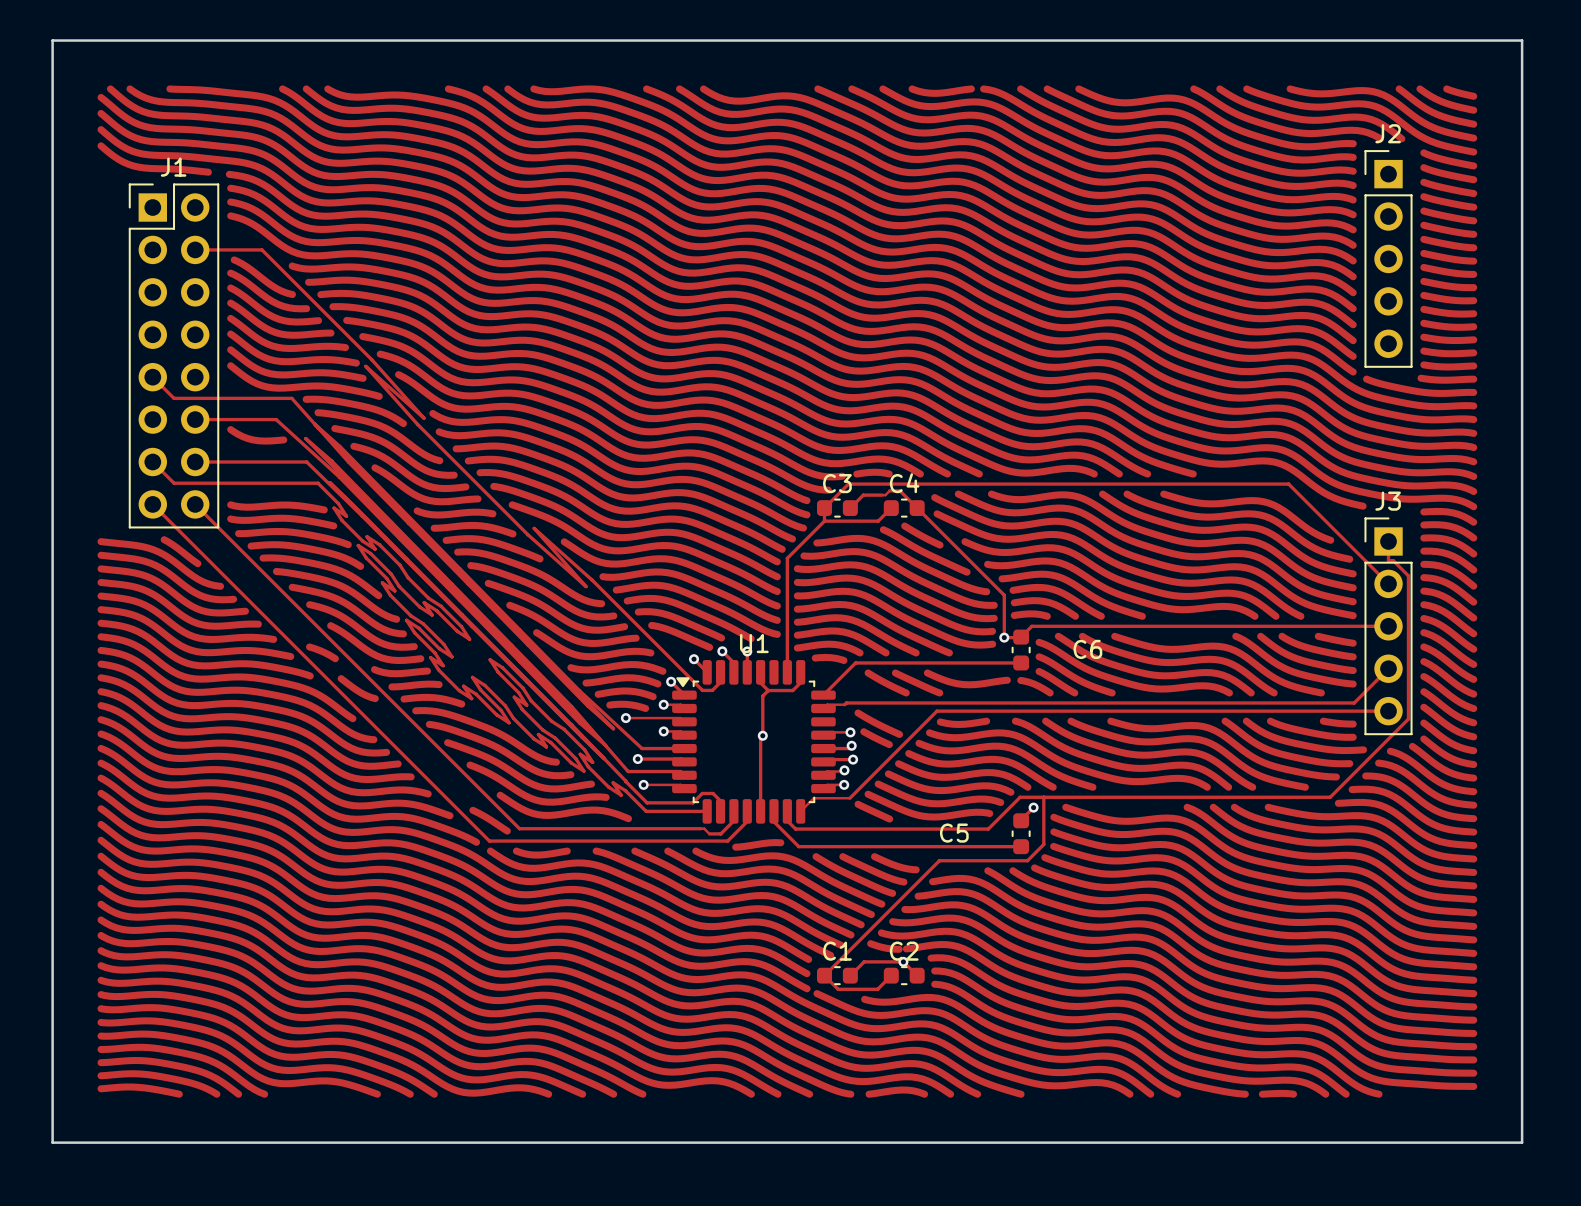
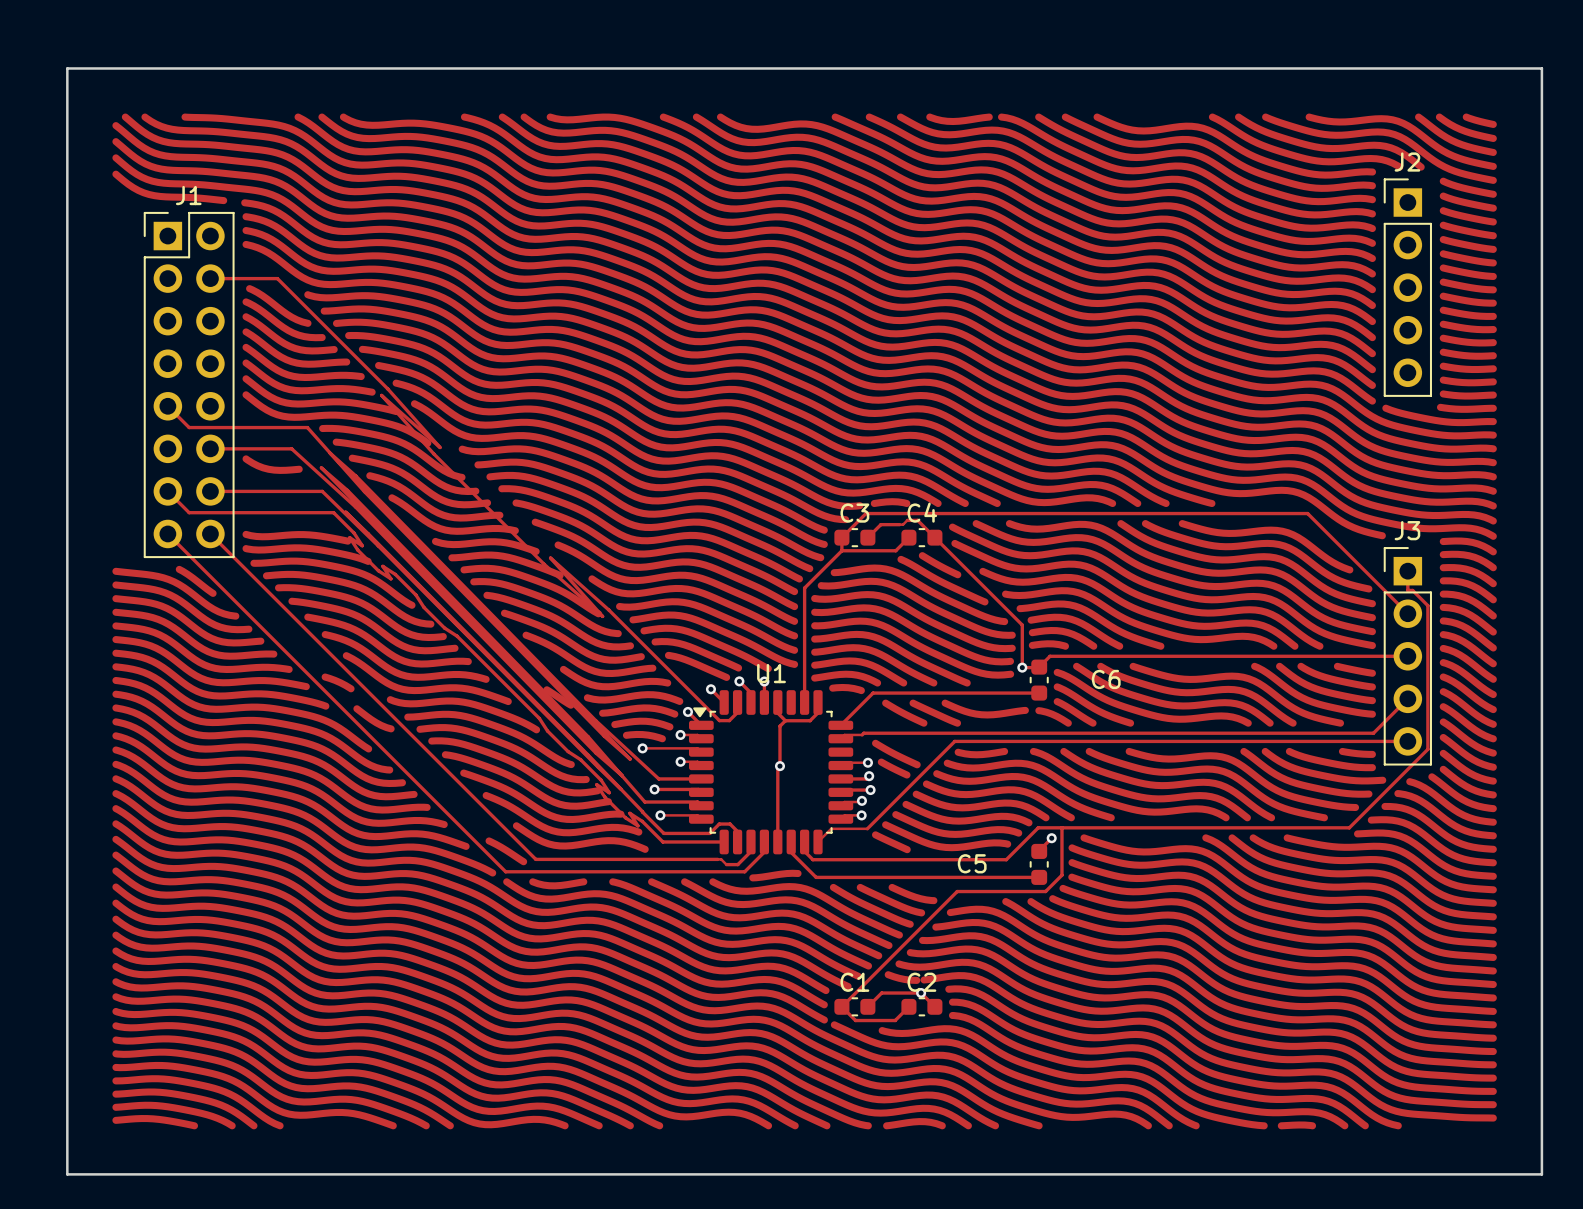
drawing: [227, 346, 811, 595] -> none
drawing: none -> [242, 375, 828, 810]
drawing shape: [227, 501, 328, 514] -> [242, 530, 352, 545]
drawing: [227, 514, 575, 780] -> none
drawing shape: [560, 538, 781, 610] -> [588, 575, 799, 640]
track: (461, 626) (469, 639) (457, 631) (436, 610) (424, 602) (432, 615) (419, 607) (370, 553) (358, 545) (366, 557) (386, 578) (394, 590) (382, 582) (390, 595) (443, 644) (451, 656) (439, 648) (419, 628) (406, 620) (414, 632) (435, 653) (443, 665) (430, 657) (438, 670) (459, 690) (471, 698) (463, 686) (476, 694) (496, 714) (509, 722) (501, 710) (480, 689) (472, 677) (484, 685) (534, 738) (546, 746) (538, 734) (550, 742) (571, 763) (583, 771) (575, 758) (522, 709) (514, 697) (526, 705) (518, 692) (498, 672) (490, 659) (502, 667) -> (477, 656) (518, 697)
drawing shape: [533, 629, 655, 661] -> [560, 665, 672, 691]
drawing shape: [444, 739, 595, 793] -> [460, 769, 625, 824]
drawing shape: [466, 761, 610, 806] -> [482, 792, 643, 837]

